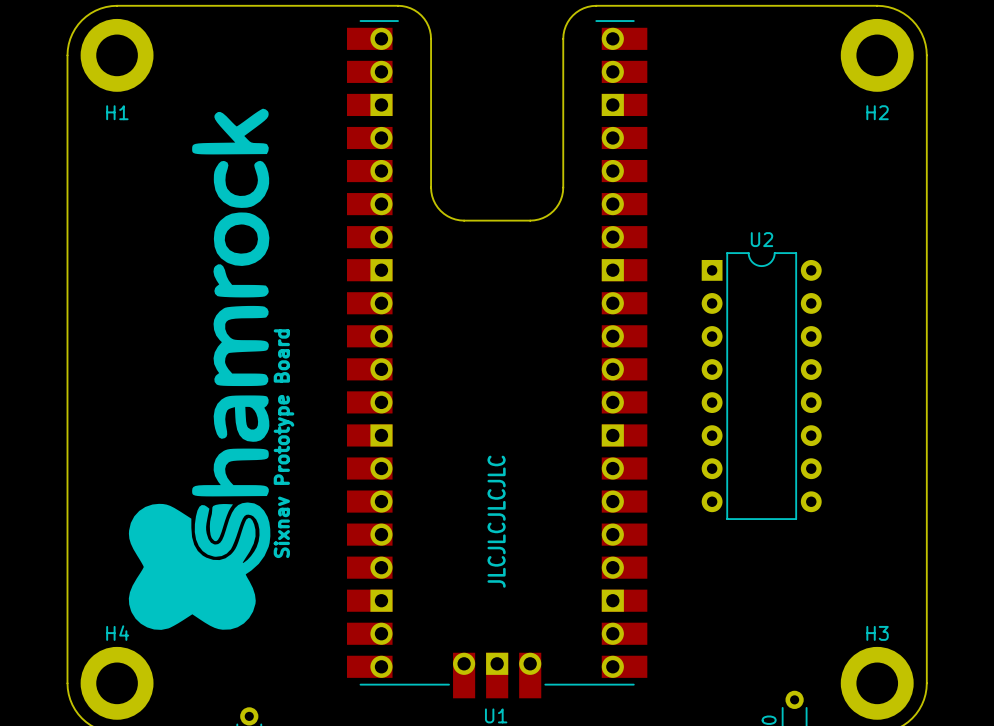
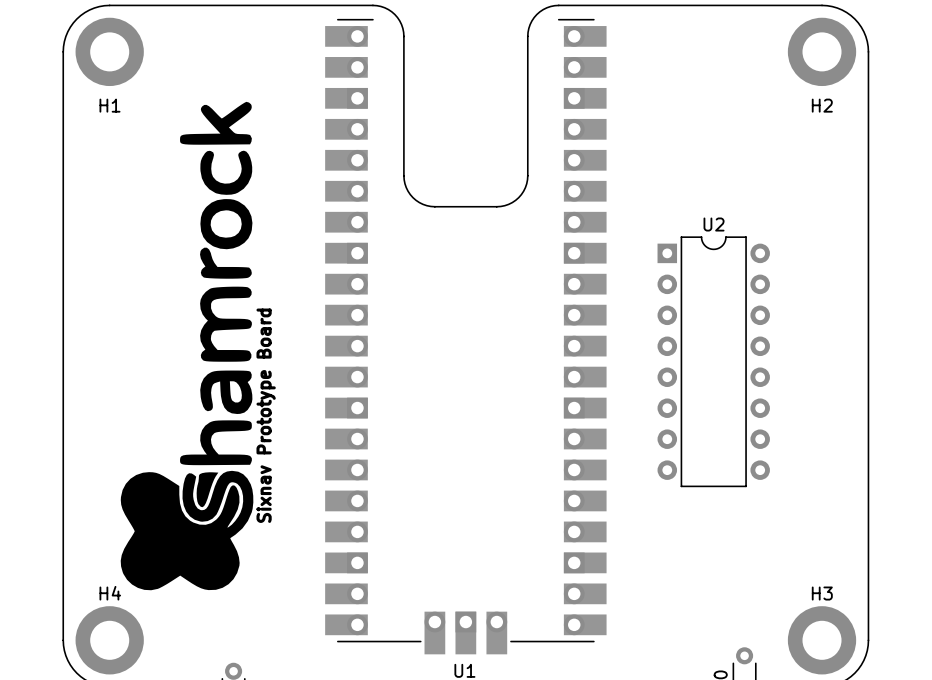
text: JLCJLCJLCJLC (496, 521) -> none

